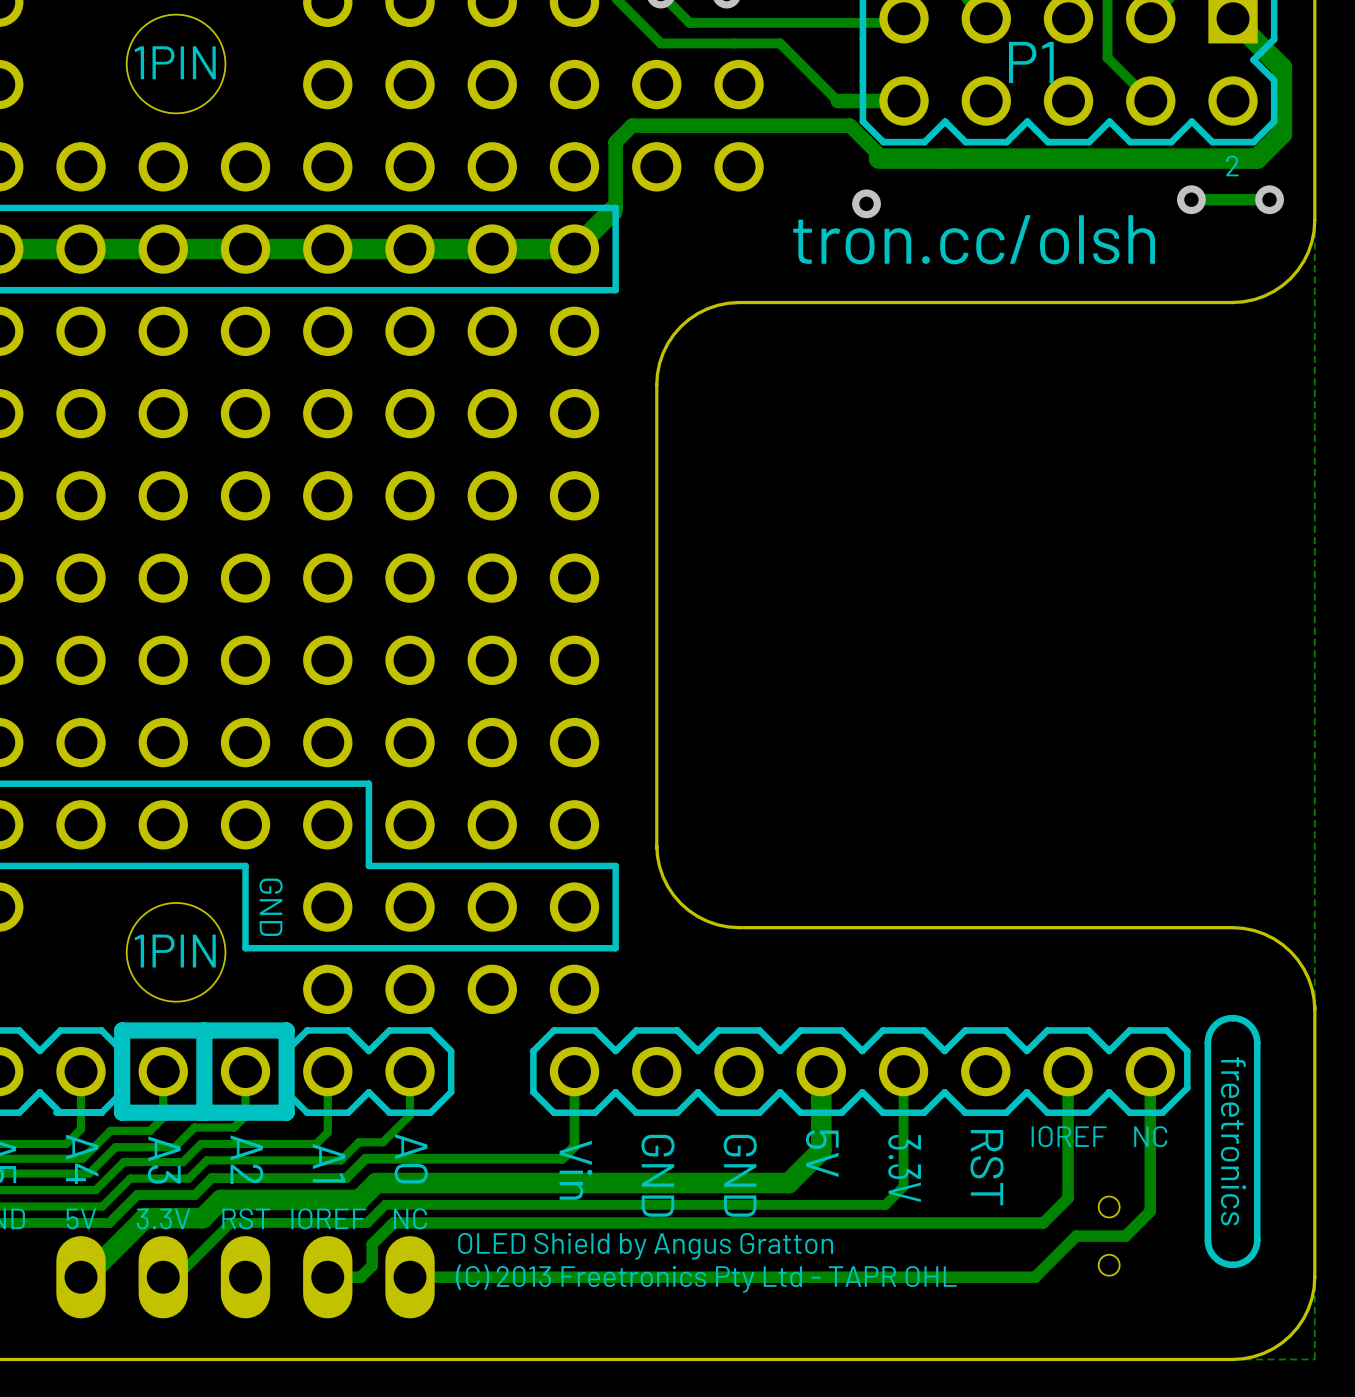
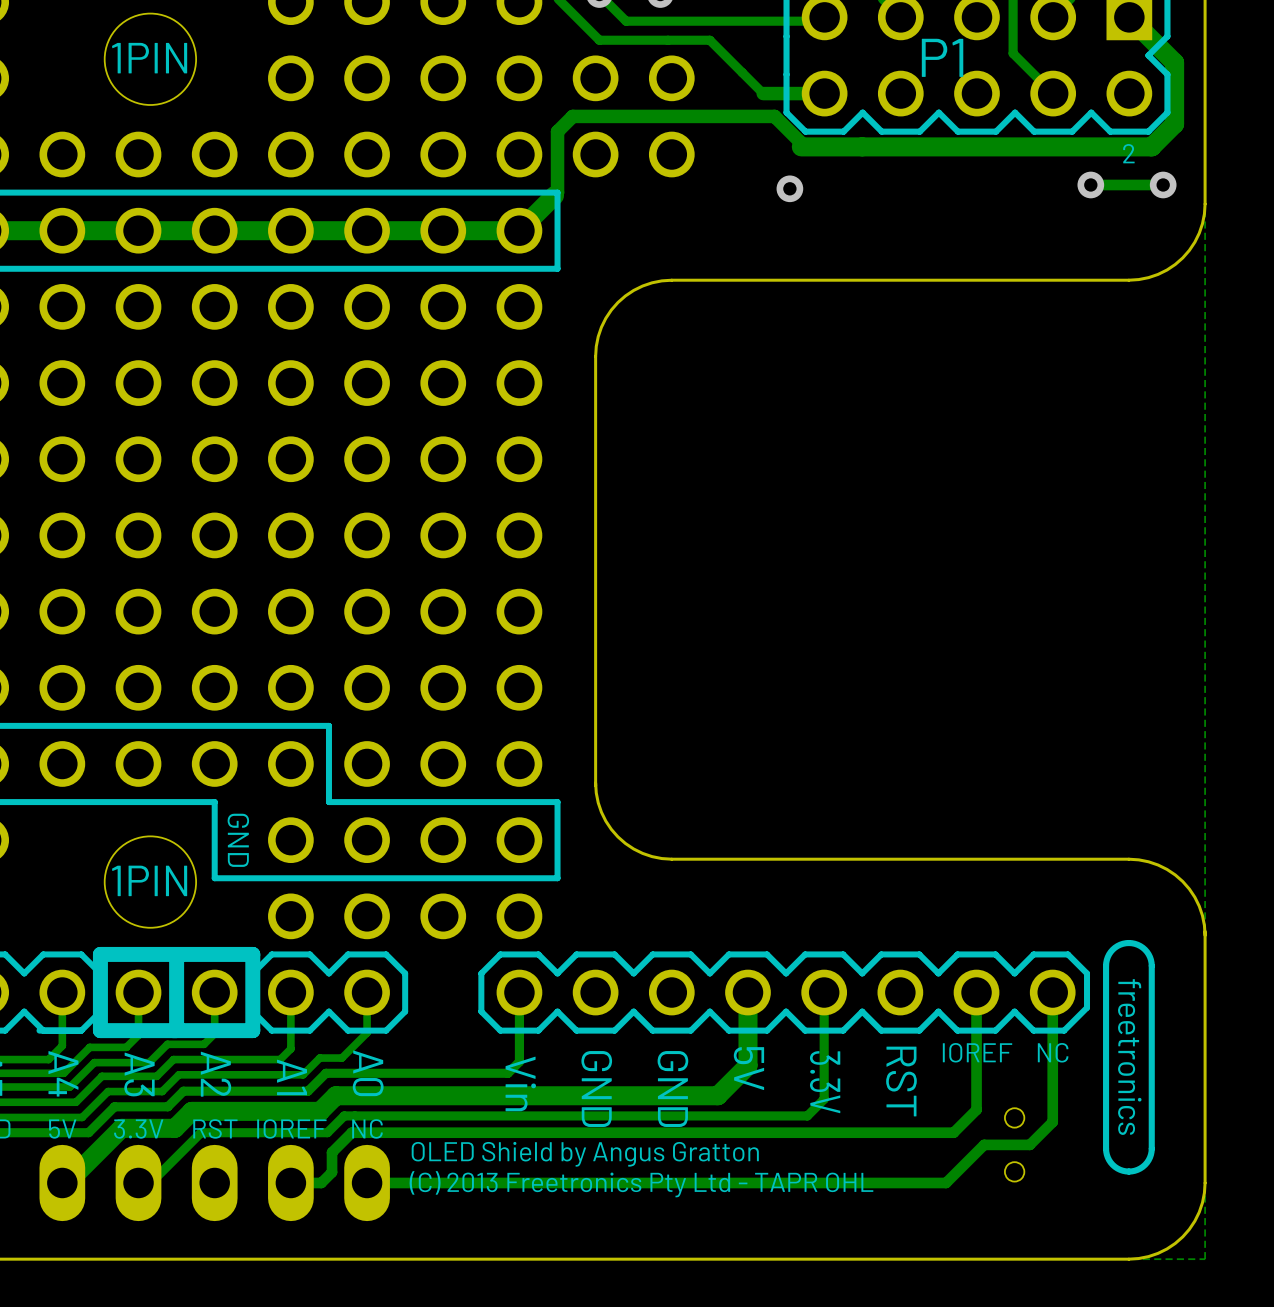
text: tron.cc/olsh (974, 239) -> none

